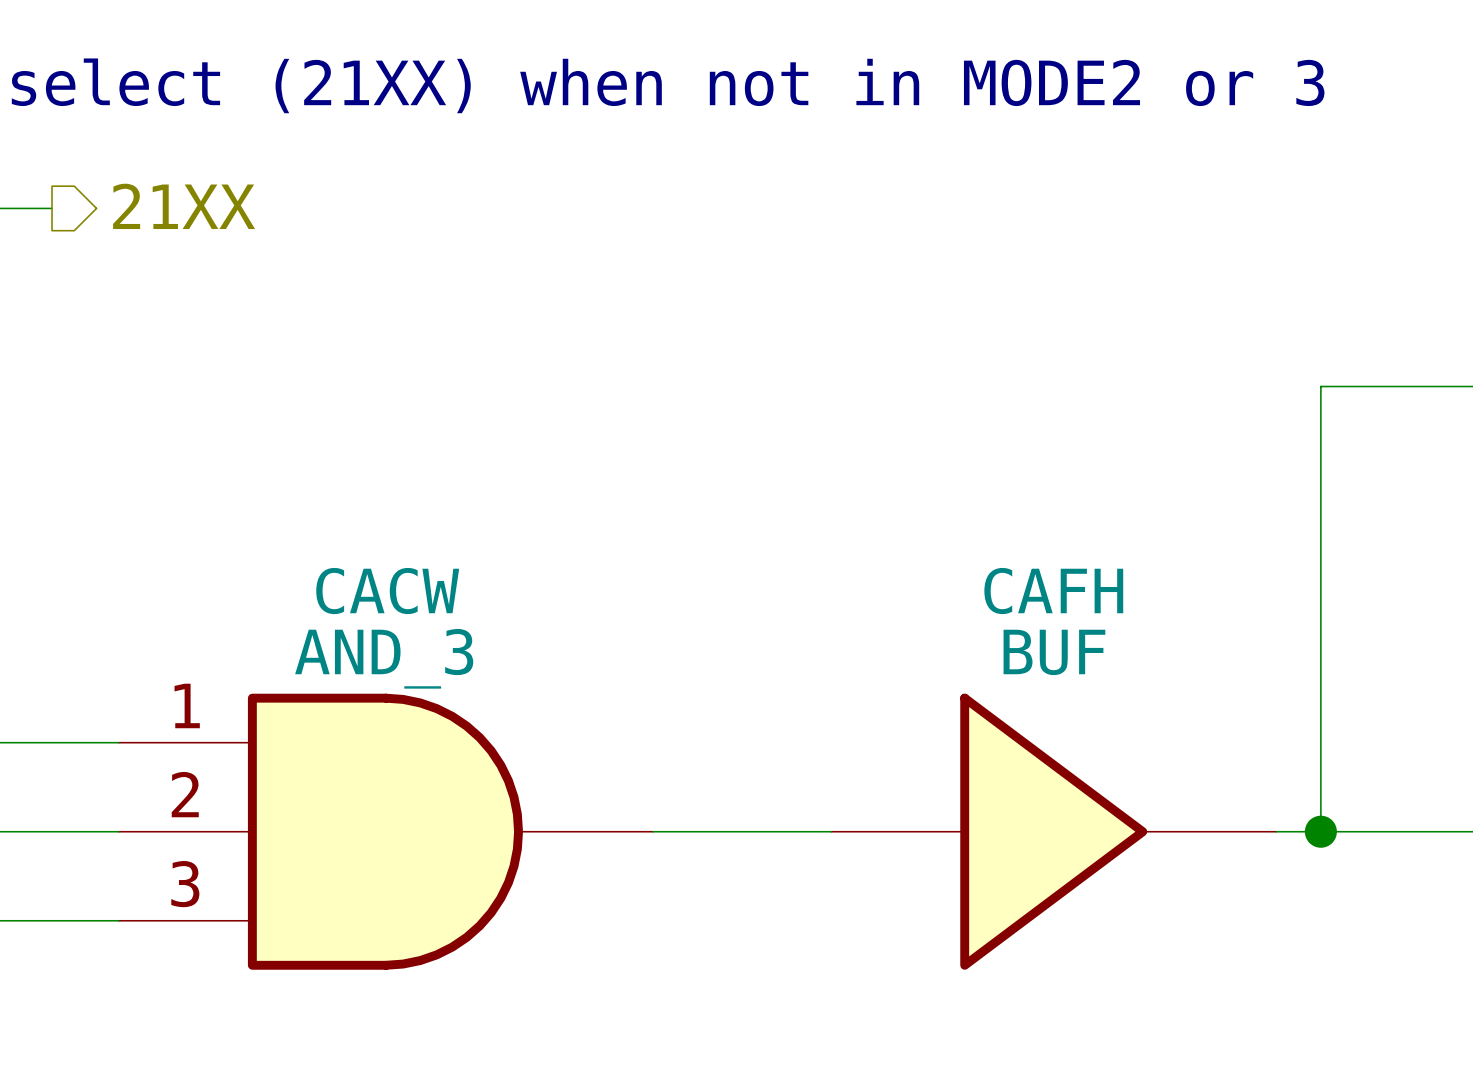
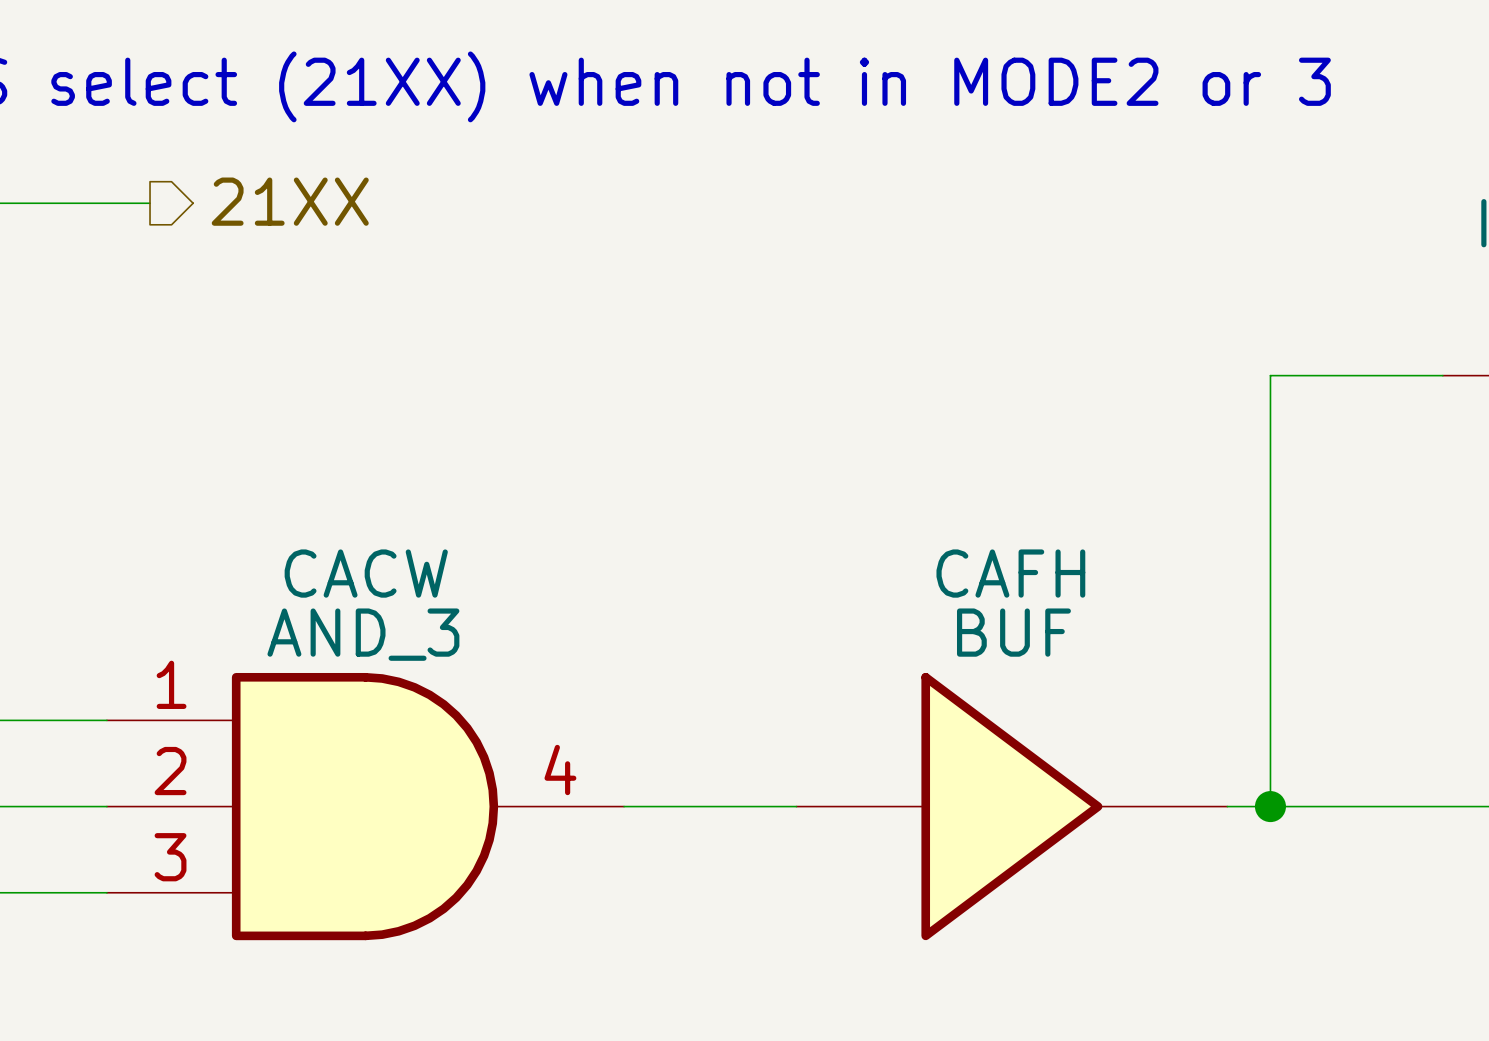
hierarchical label position: 21XX (184, 206) -> 21XX (290, 201)
wire: none -> (42, 203) (150, 203)
CACW pin number: none -> 4 (560, 770)

